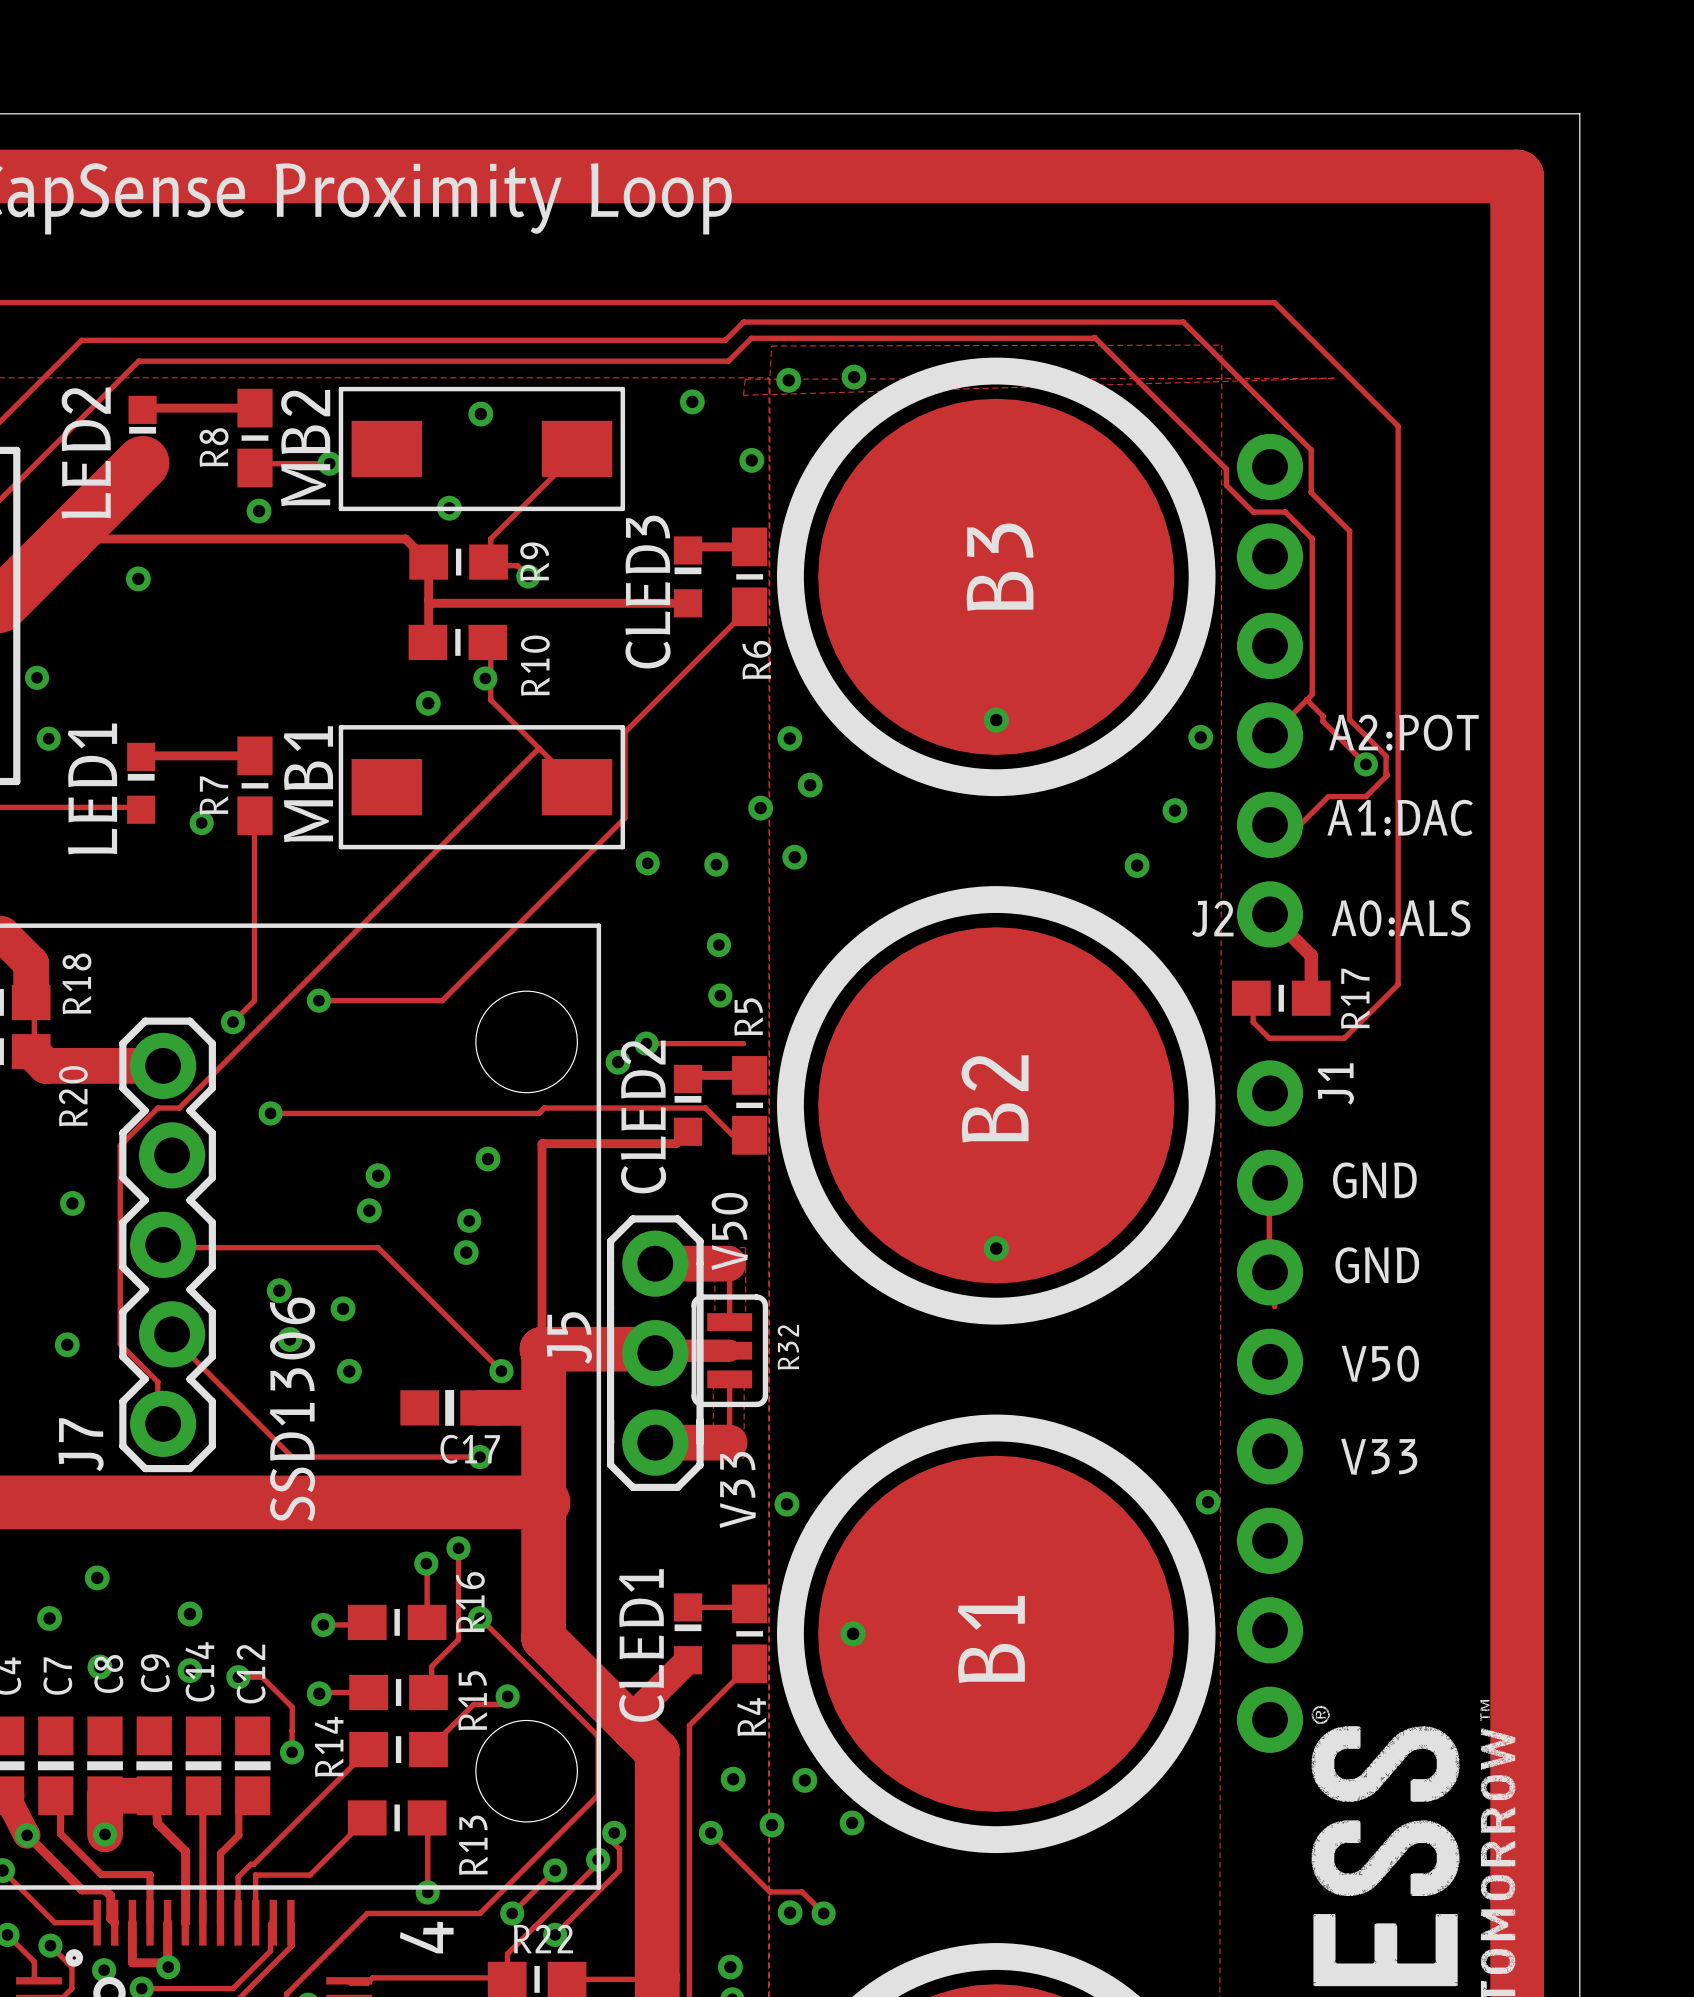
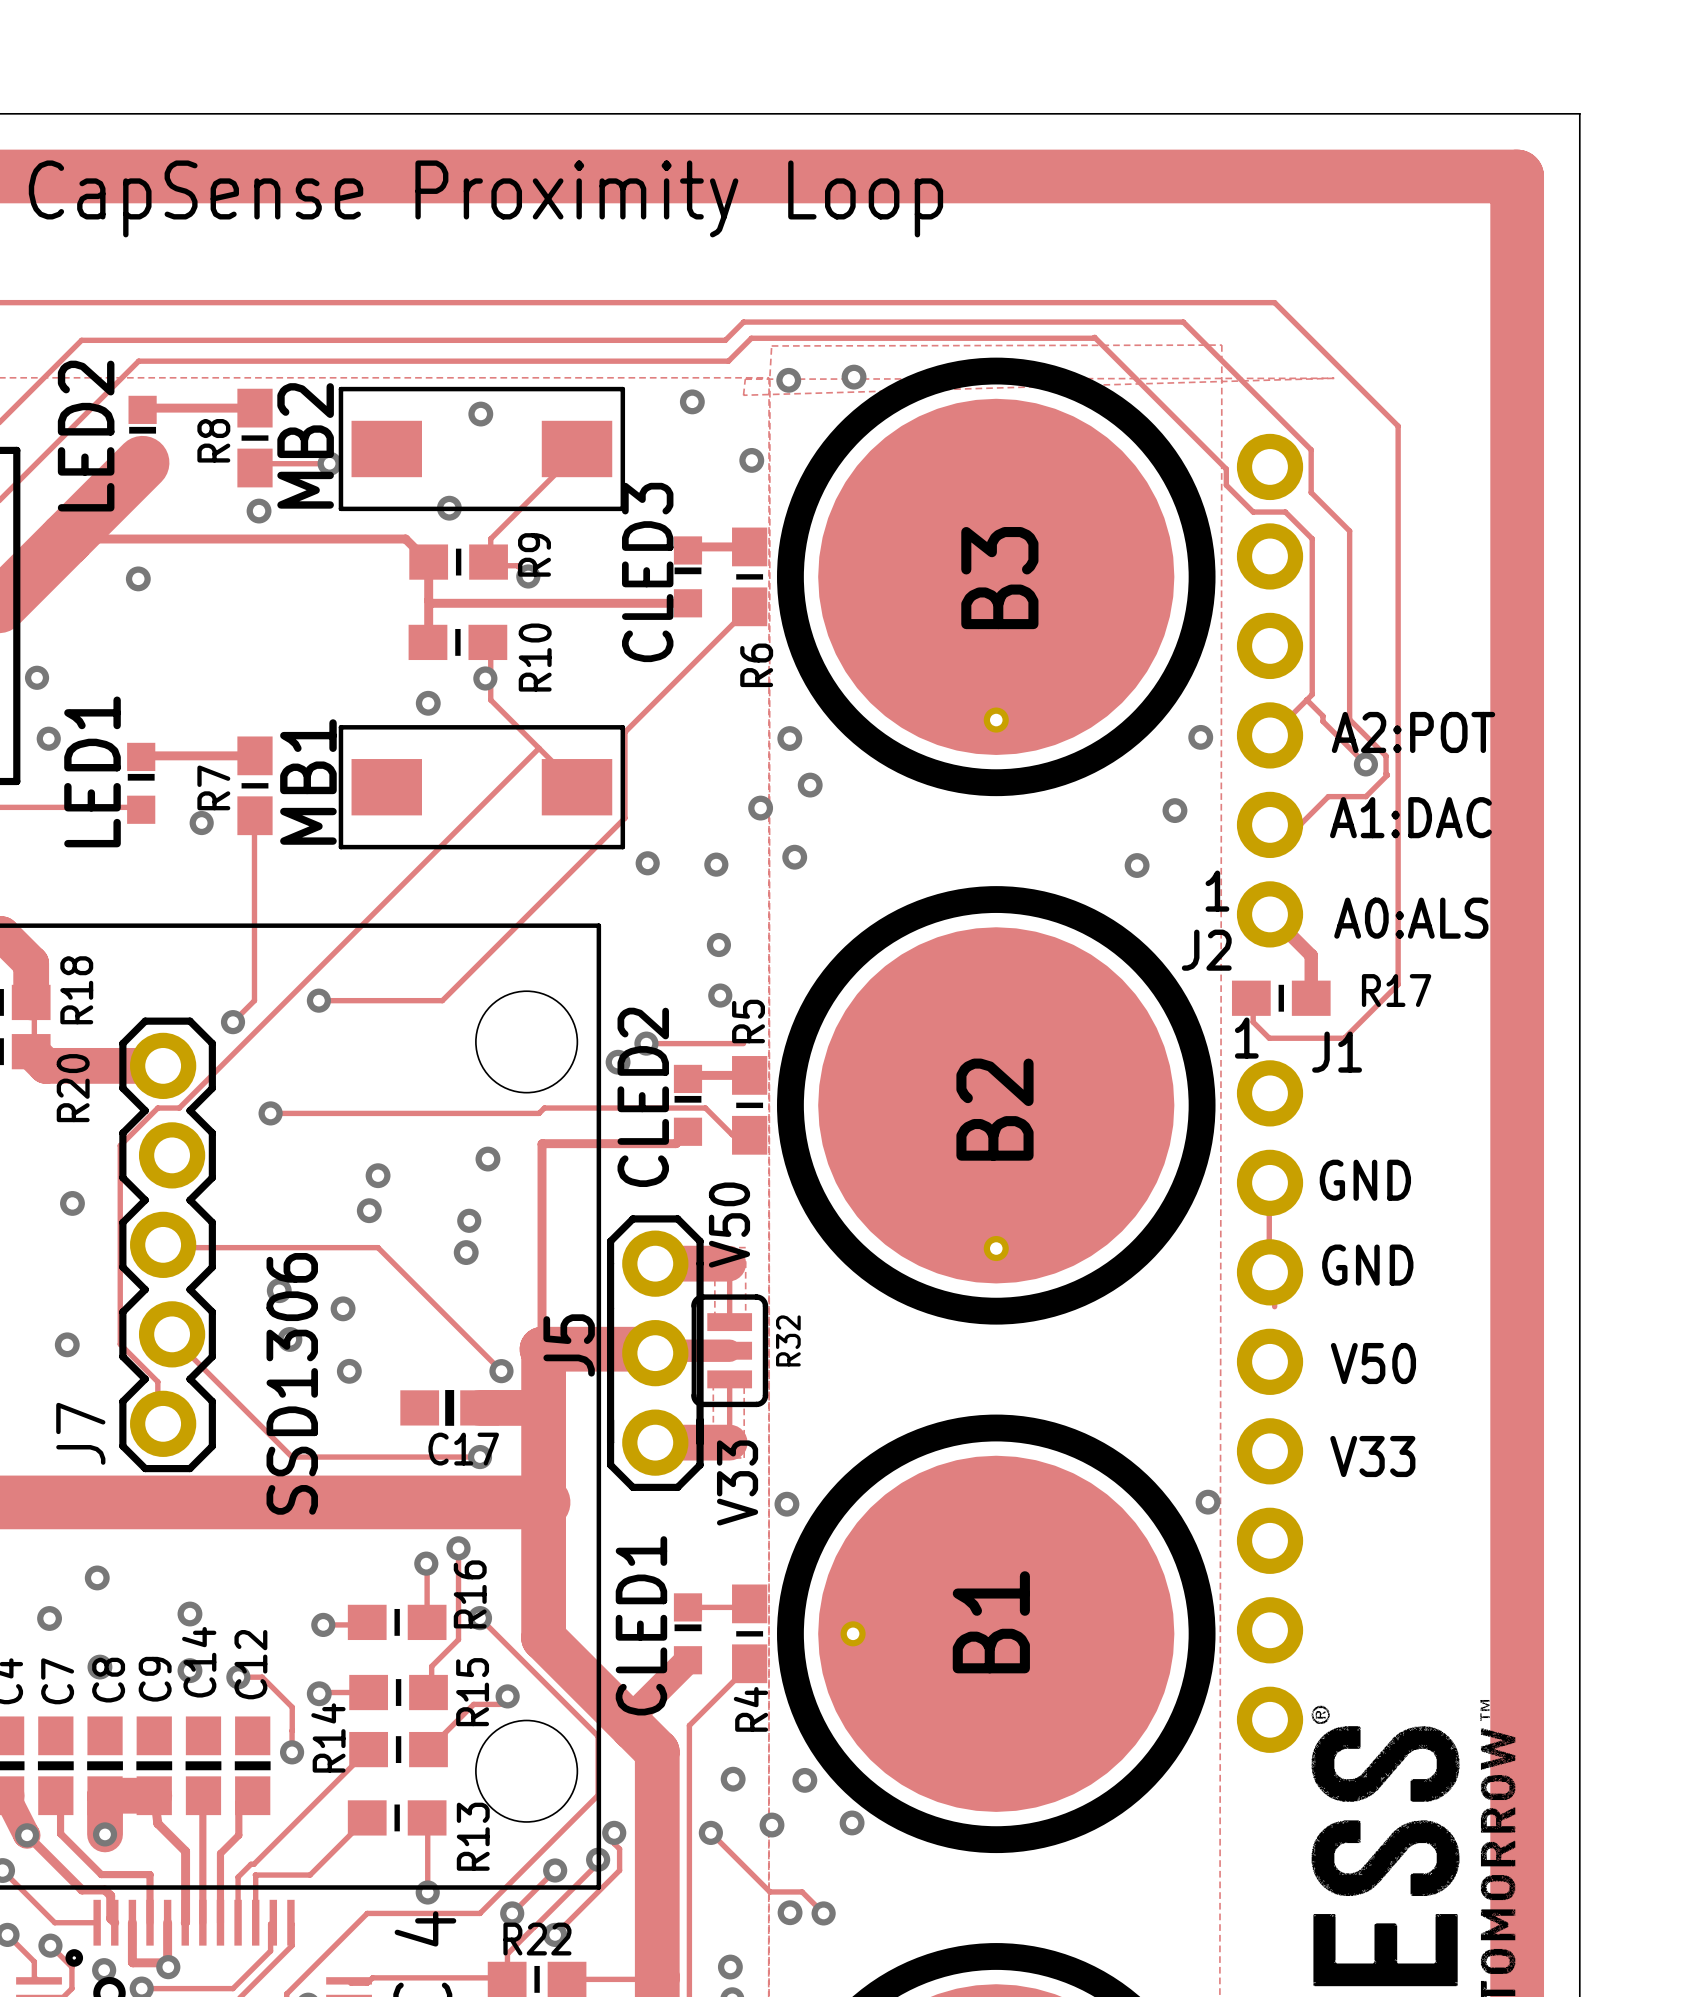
text: none -> 1 (1217, 891)
text position: J2 (1212, 918) -> J2 (1206, 950)
R17 name rotation: 0° (1355, 998) -> 90° clockwise (1396, 990)
text: none -> 1 (1246, 1038)
text rotation: 0° (1335, 1083) -> 90° clockwise (1337, 1052)

